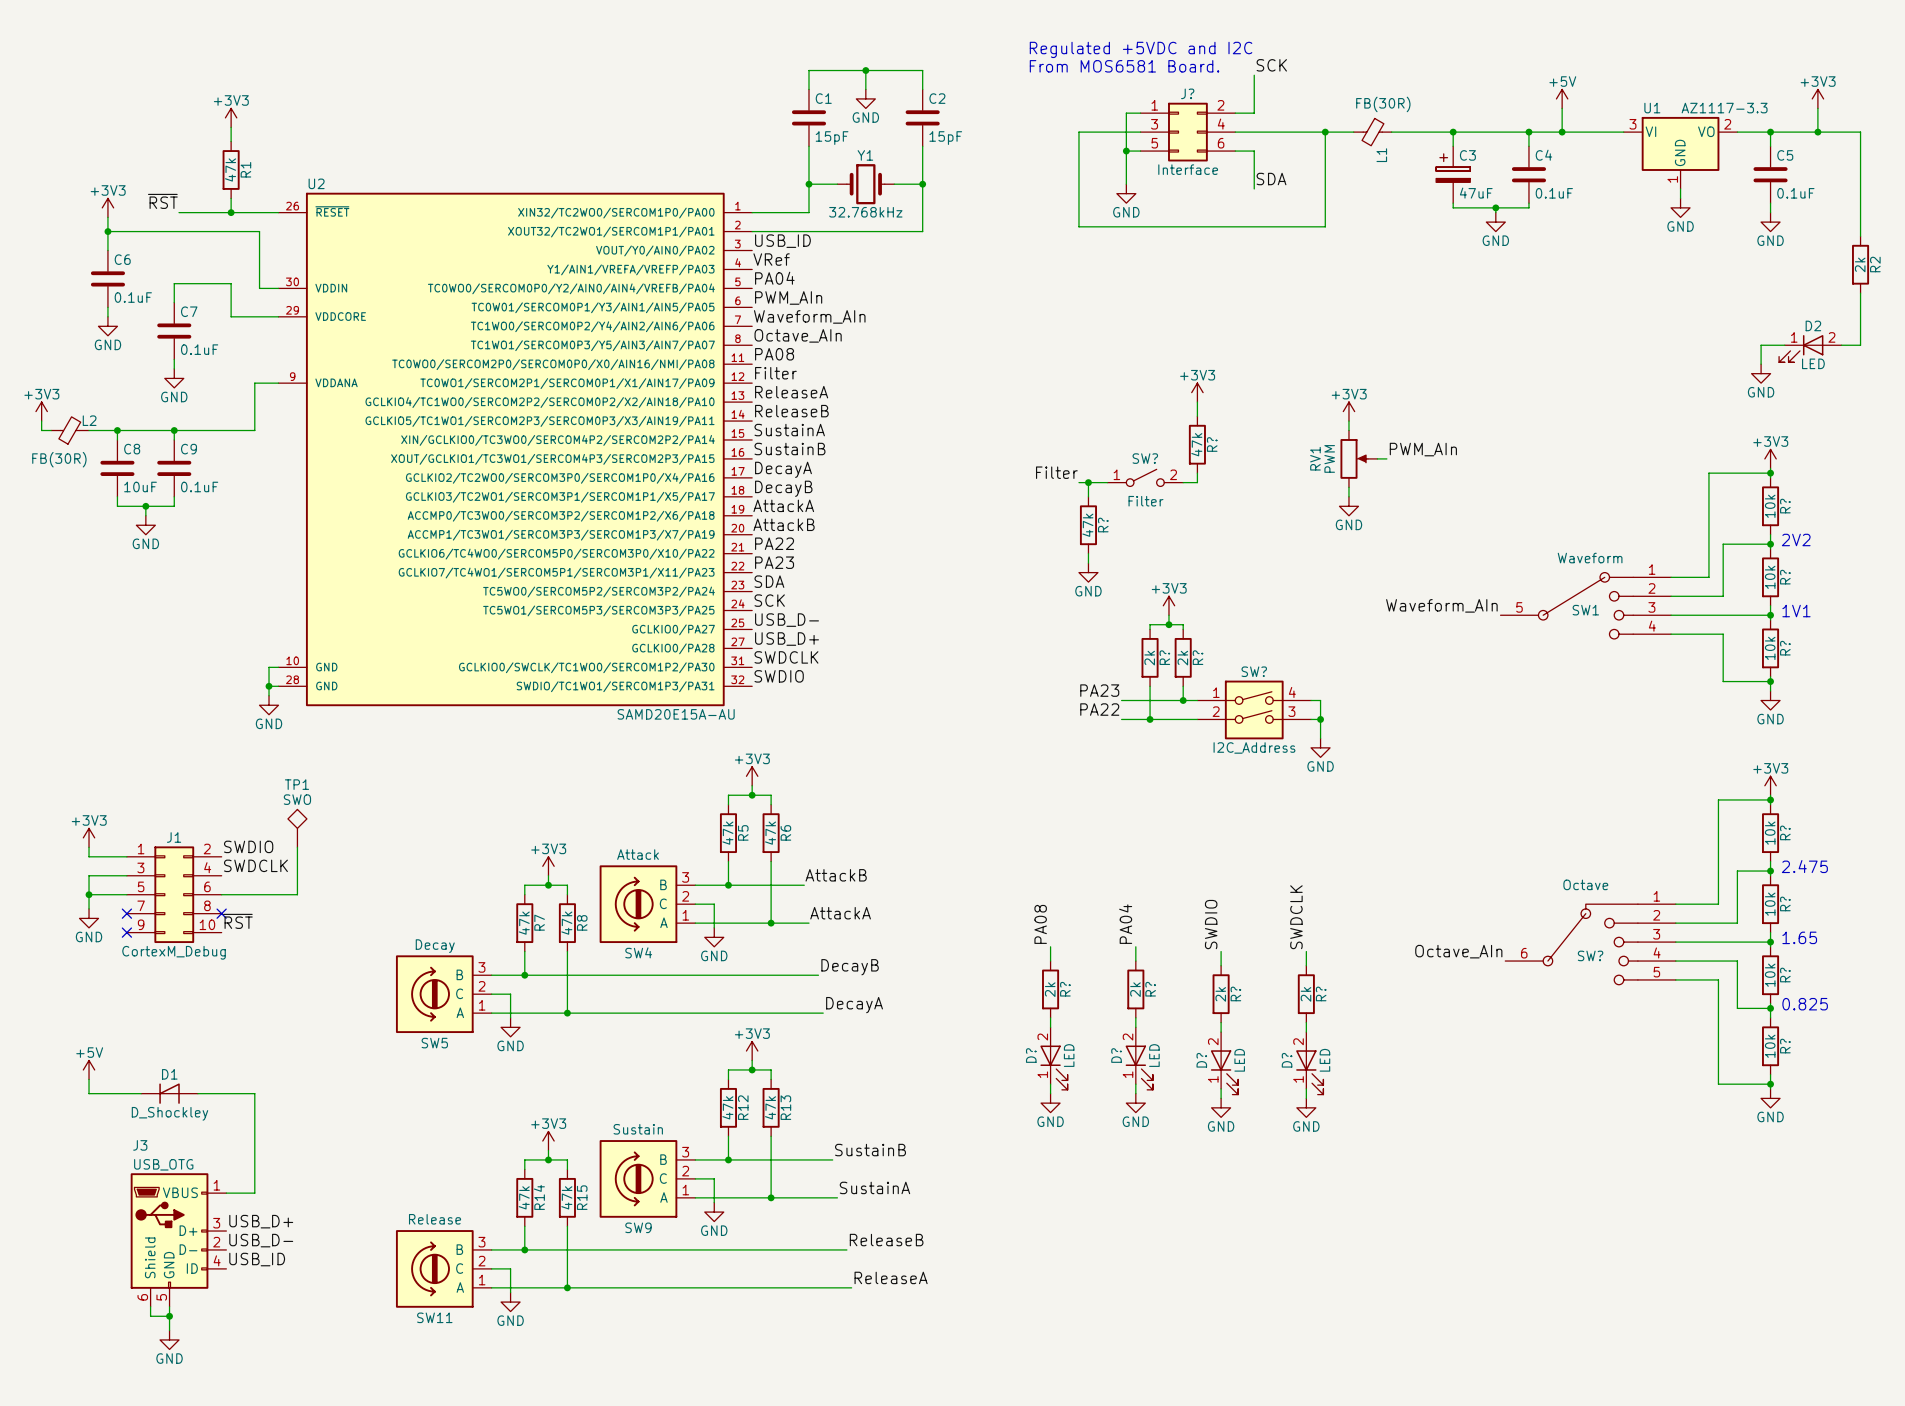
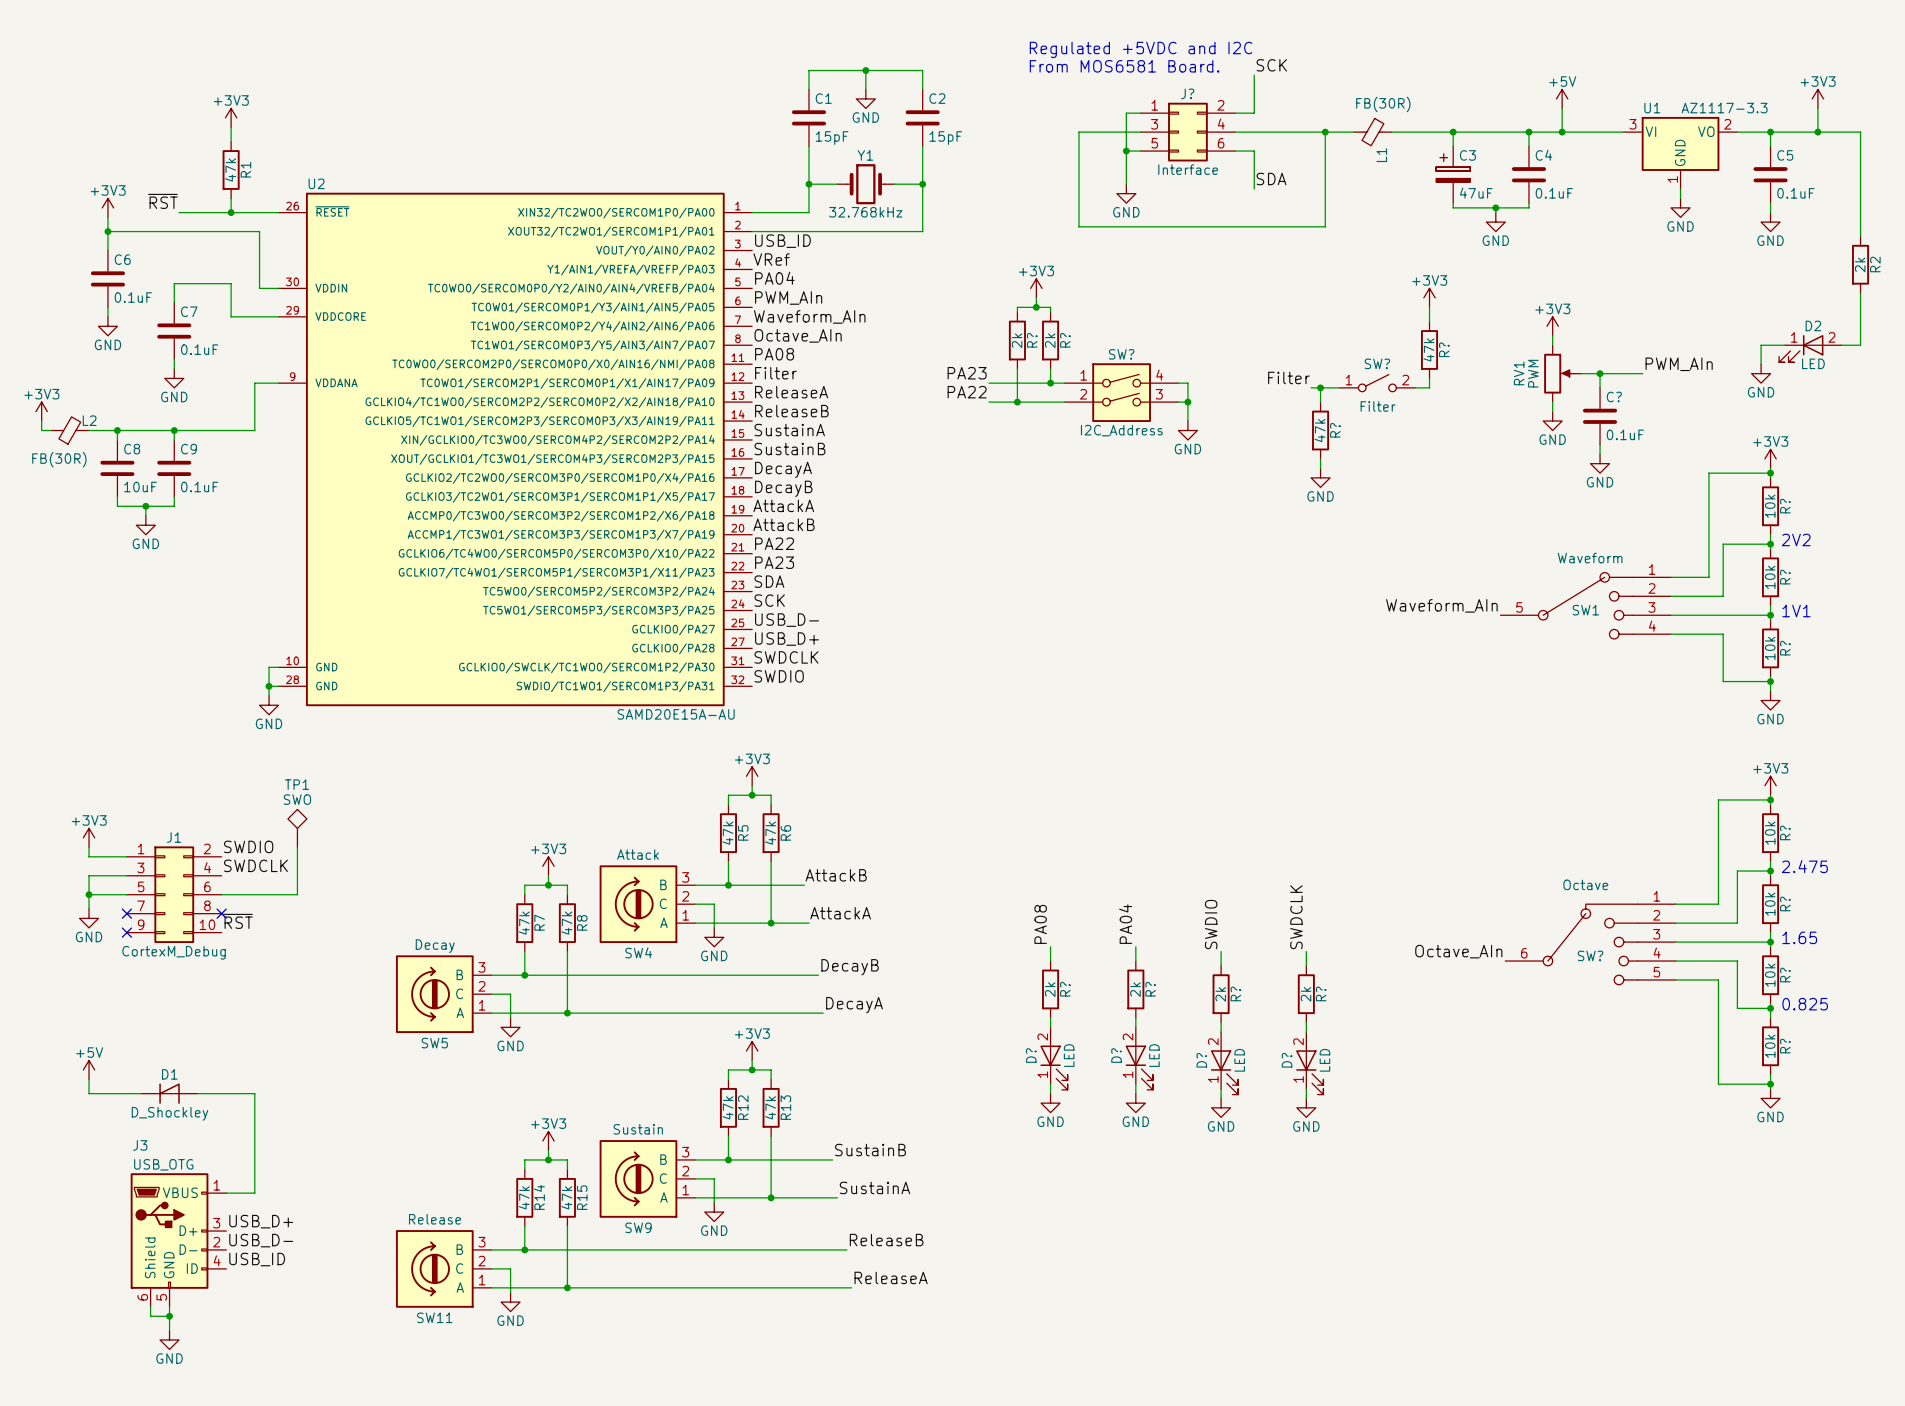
power symbol: none -> +3V3 (1036, 288)
wire: none -> (1036, 297) (1036, 307)
power symbol: none -> +3V3 (1429, 297)
junction: none -> (1036, 307)
wire: none -> (1429, 307) (1429, 321)
wire: none -> (1017, 312) (1017, 307) (1050, 307) (1050, 312)
power symbol: none -> +3V3 (1552, 326)
wire: none -> (1552, 335) (1552, 345)
R?: none -> 2k (1017, 340)
R?: none -> 2k (1050, 340)
R?: none -> 47k (1429, 349)
label: none -> PWM_AIn (1679, 364)
wire: none -> (1017, 368) (1017, 402)
label: none -> PA23 (967, 373)
wire: none -> (1581, 373) (1642, 373)
wire: none -> (1600, 373) (1600, 387)
junction: none -> (1600, 373)
label: none -> Filter (1288, 377)
wire: none -> (1429, 378) (1429, 387) (1415, 387)
wire: none -> (988, 383) (1064, 383)
junction: none -> (1050, 383)
wire: none -> (1178, 383) (1187, 383) (1187, 421)
SW?: none -> Filter (1377, 383)
wire: none -> (1311, 387) (1339, 387)
junction: none -> (1320, 387)
label: none -> PA22 (967, 392)
SW?: none -> I2C_Address (1121, 392)
power symbol: +3V3 (1197, 392) -> none
wire: none -> (988, 402) (1064, 402)
junction: none -> (1017, 402)
wire: none -> (1178, 402) (1187, 402)
junction: none -> (1187, 402)
wire: (1197, 402) (1197, 416) -> (1320, 387) (1320, 402)
wire: none -> (1552, 402) (1552, 411)
power symbol: +3V3 (1348, 411) -> none
C?: none -> 0.1uF (1600, 416)
wire: (1348, 421) (1348, 430) -> none
power symbol: none -> GND (1552, 421)
power symbol: none -> GND (1187, 430)
R? position: (1197, 444) -> (1320, 430)
wire: none -> (1600, 444) (1600, 454)
label: PWM_AIn (1423, 449) -> none
RV1 position: (1358, 458) -> (1562, 373)
wire: (1377, 458) (1386, 458) -> none
power symbol: none -> GND (1600, 463)
label: Filter (1056, 472) -> none
wire: (1197, 473) (1197, 482) (1183, 482) -> none
SW?: Filter (1145, 477) -> none
wire: (1078, 482) (1107, 482) -> none
wire: (1088, 482) (1088, 496) -> (1050, 368) (1050, 383)
junction: (1088, 482) -> none
wire: (1348, 487) (1348, 496) -> (1320, 458) (1320, 468)
power symbol position: GND (1348, 506) -> GND (1320, 477)
R?: 47k (1088, 525) -> none
wire: (1088, 553) (1088, 563) -> none
power symbol: GND (1088, 572) -> none
power symbol: +3V3 (1168, 605) -> none
wire: (1168, 615) (1168, 624) -> none
junction: (1168, 624) -> none
wire: (1150, 629) (1150, 624) (1183, 624) (1183, 629) -> none
R?: 2k (1150, 657) -> none
R?: 2k (1183, 657) -> none
wire: (1150, 686) (1150, 719) -> none
wire: (1183, 686) (1183, 700) -> none
label: PA23 (1099, 690) -> none
wire: (1121, 700) (1197, 700) -> none
junction: (1183, 700) -> none
wire: (1311, 700) (1320, 700) (1320, 738) -> none
label: PA22 (1099, 709) -> none
SW?: I2C_Address (1254, 709) -> none
wire: (1121, 719) (1197, 719) -> none
junction: (1150, 719) -> none
wire: (1311, 719) (1320, 719) -> none
junction: (1320, 719) -> none
power symbol: GND (1320, 747) -> none

